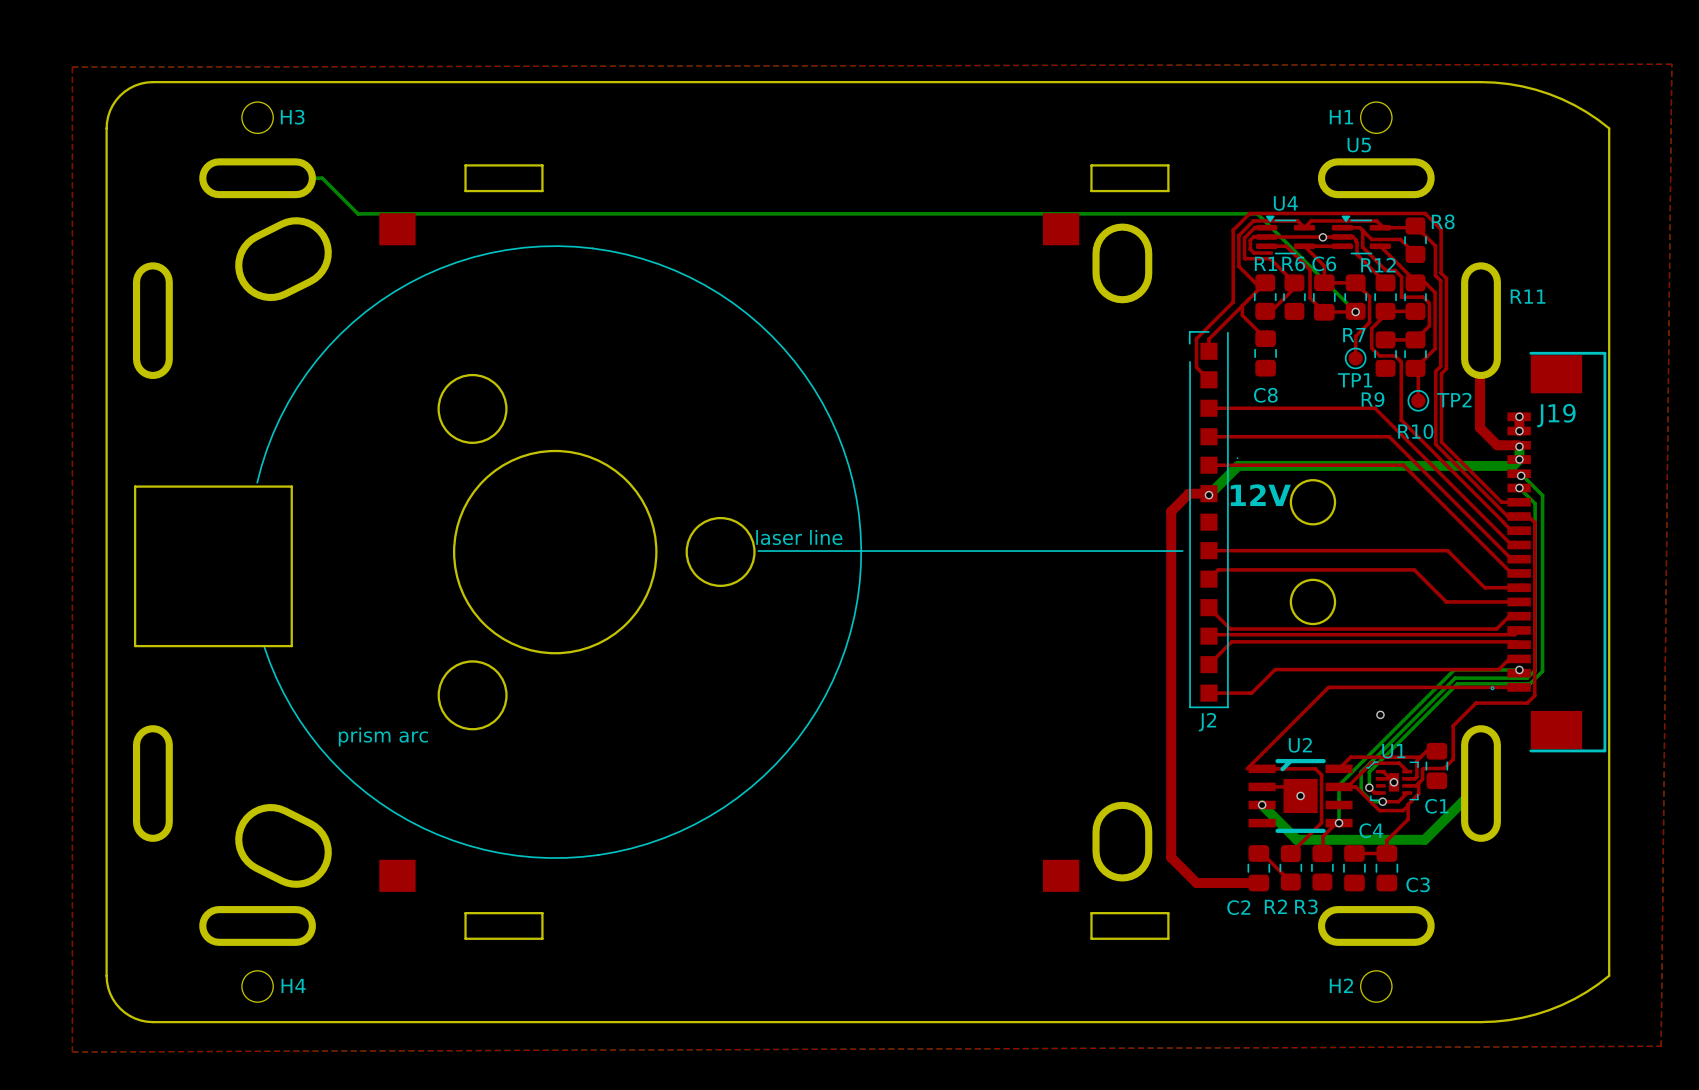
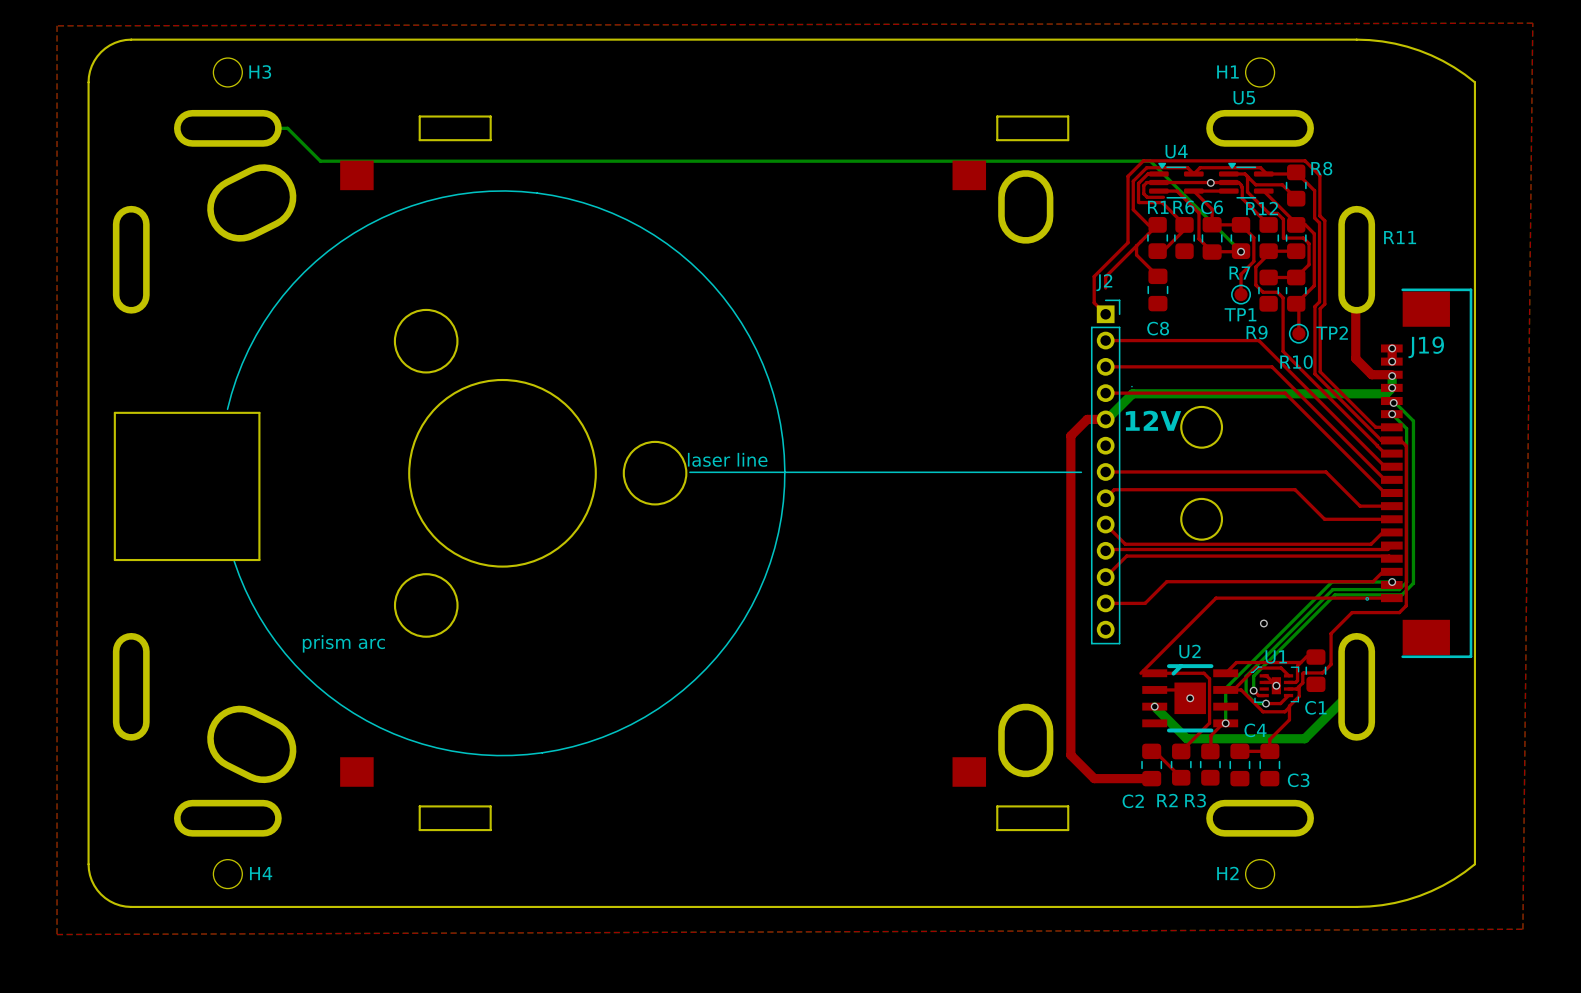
J2 footprint: [1188, 331, 1229, 709] -> [1090, 299, 1121, 645]
J2 name position: J2 (1207, 722) -> J2 (1104, 282)

